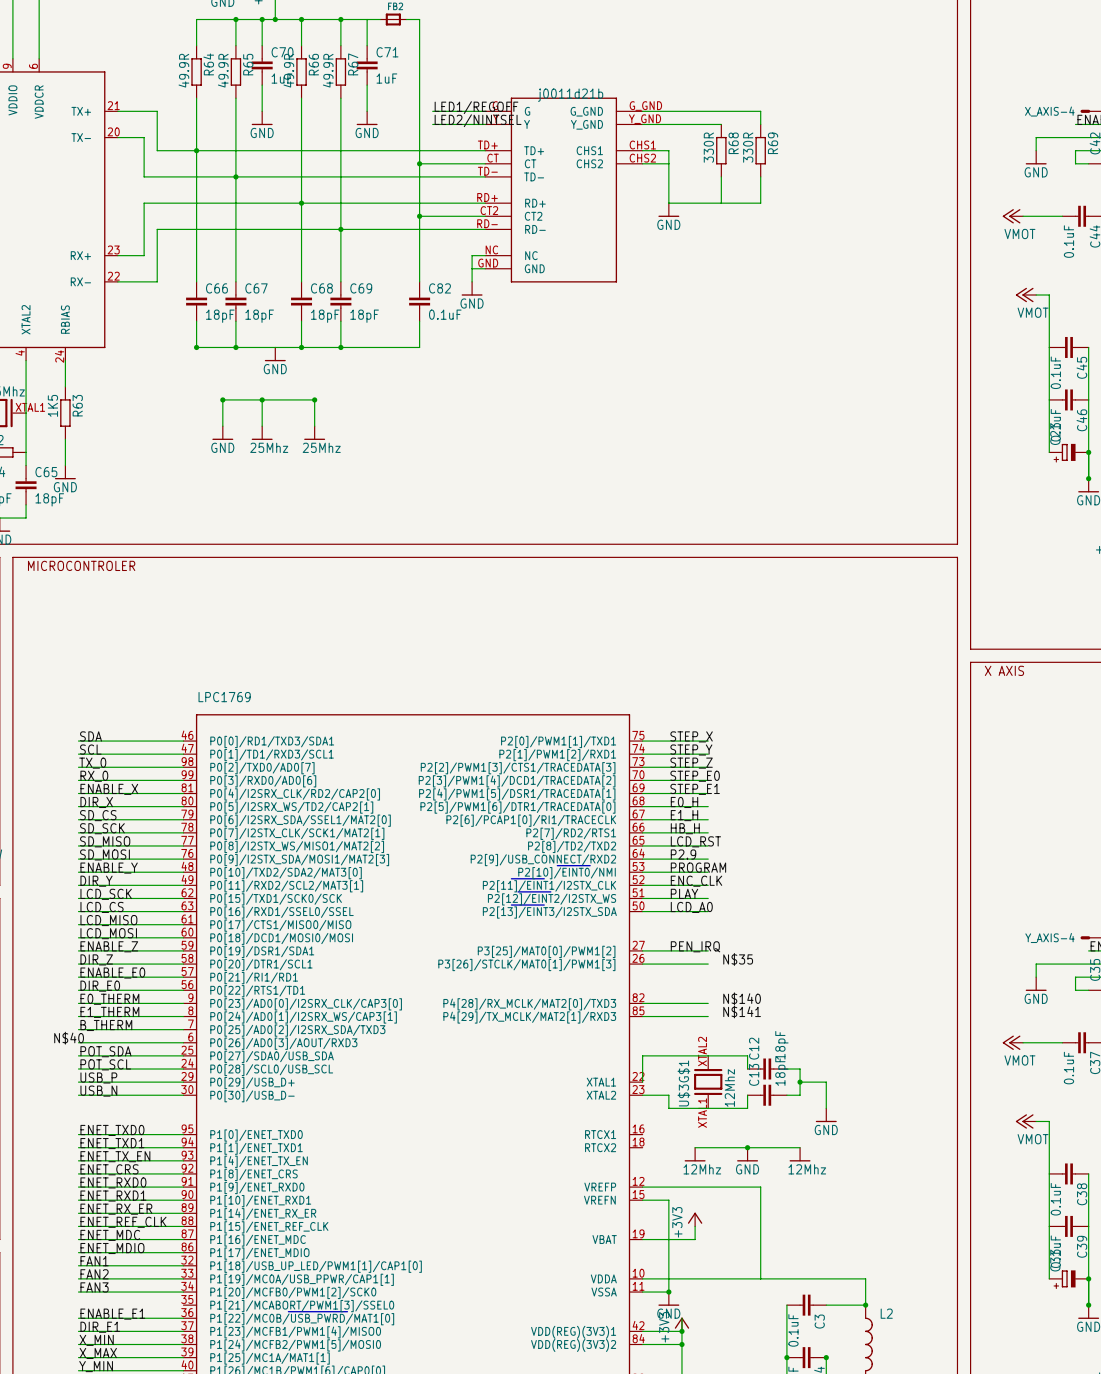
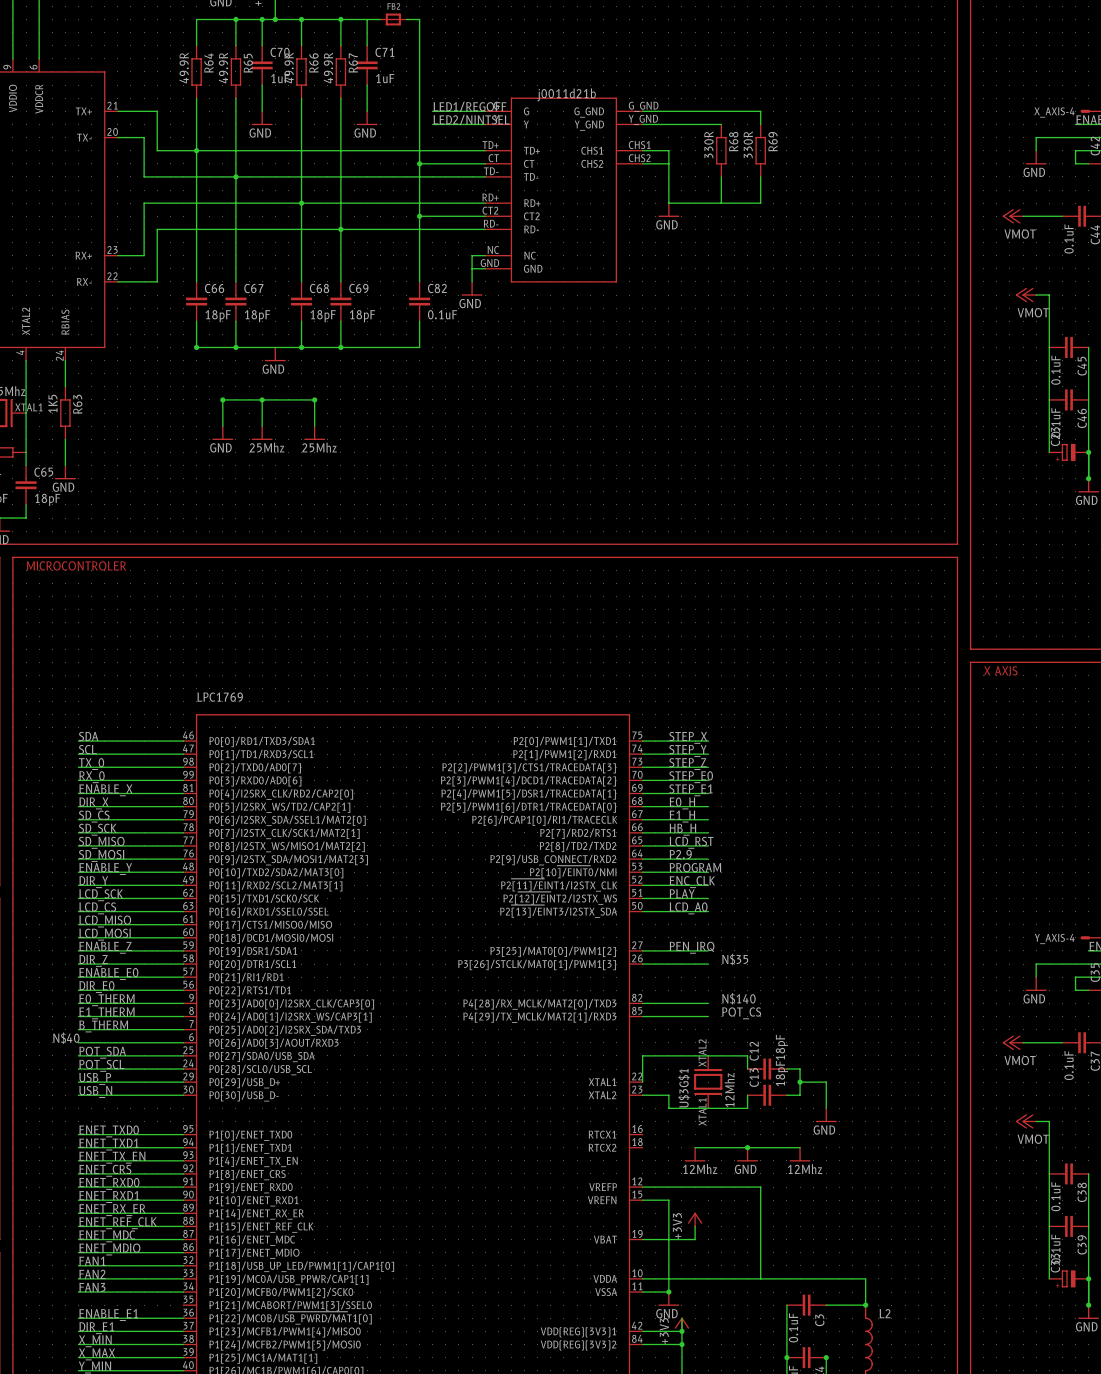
label: N$141 (742, 1011) -> POT_CS (741, 1013)

